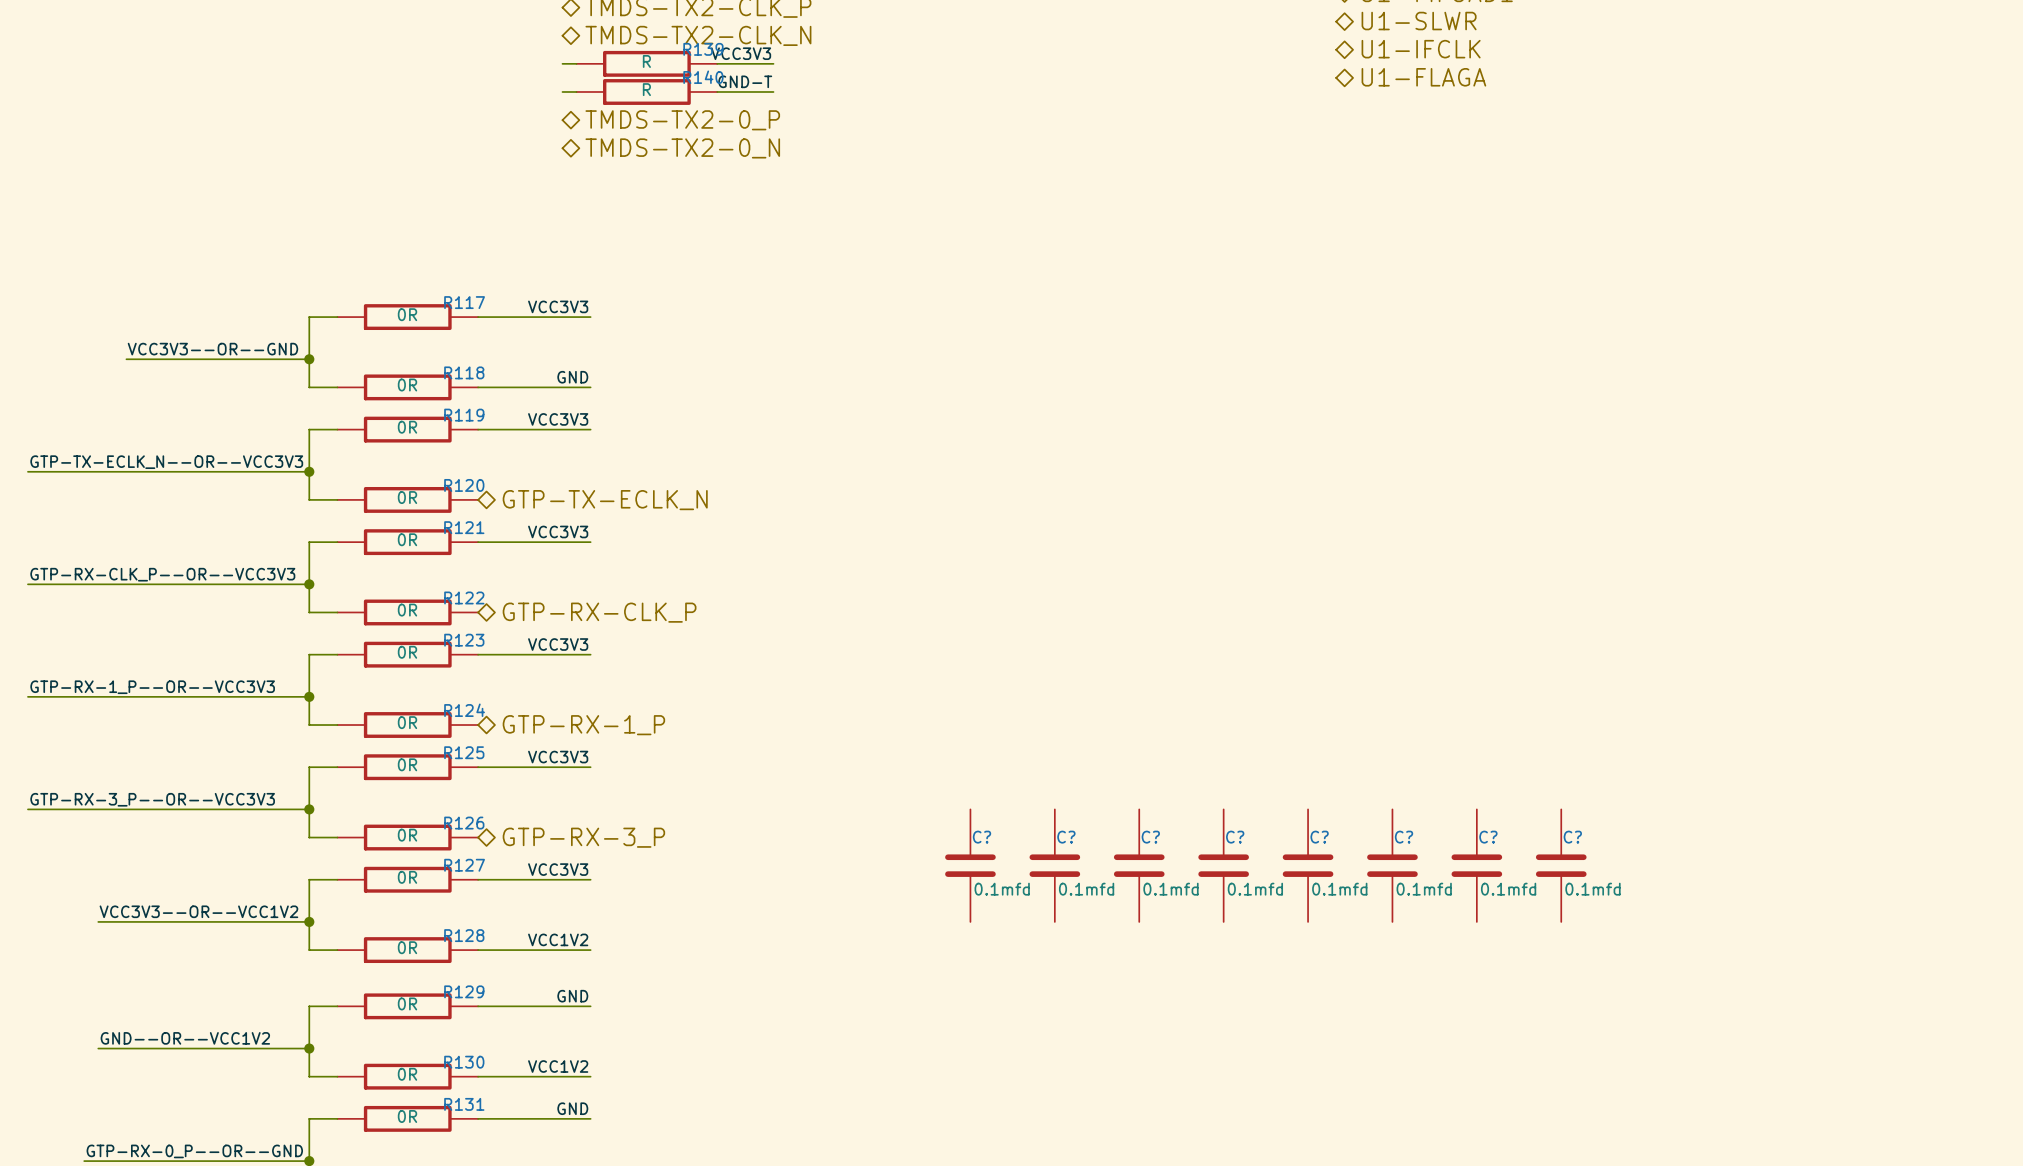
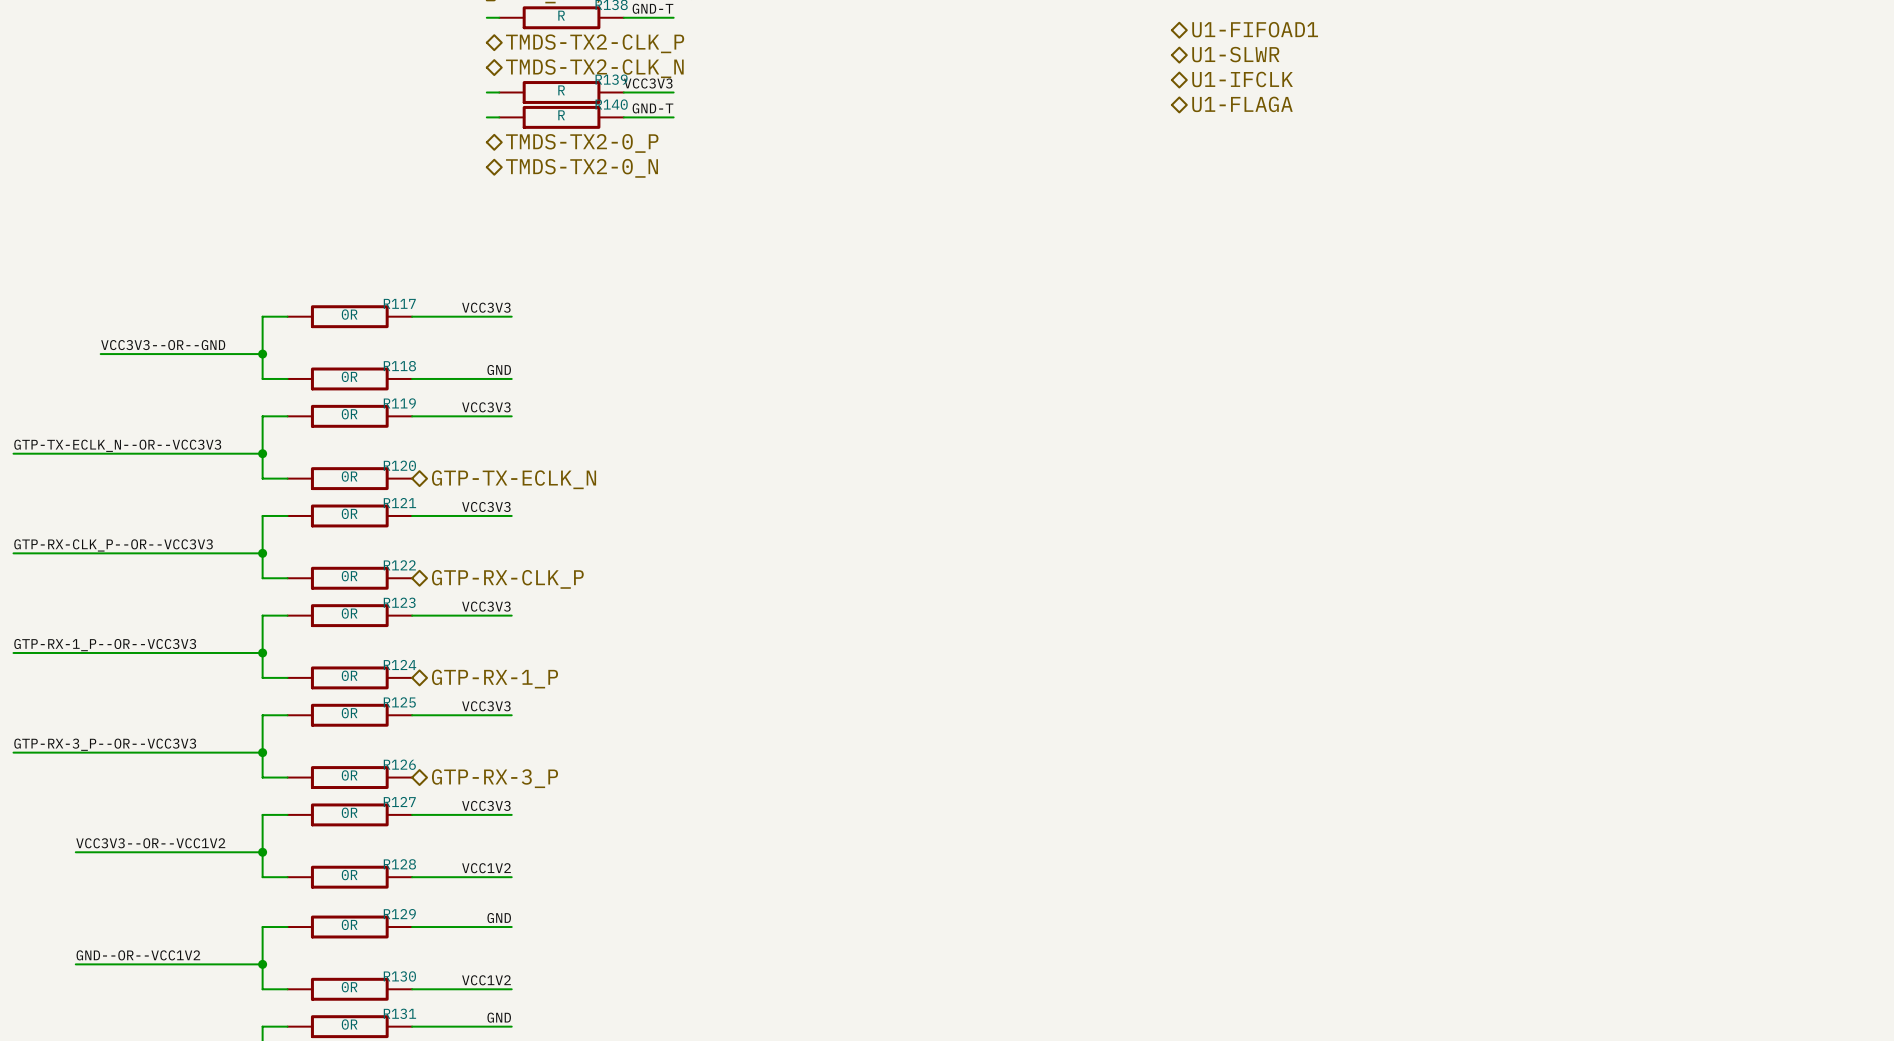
C?: 0.1mfd (970, 865) -> none
C?: 0.1mfd (1054, 865) -> none
C?: 0.1mfd (1139, 865) -> none
C?: 0.1mfd (1223, 865) -> none
C?: 0.1mfd (1308, 865) -> none
C?: 0.1mfd (1392, 865) -> none
C?: 0.1mfd (1476, 865) -> none
C?: 0.1mfd (1561, 865) -> none

